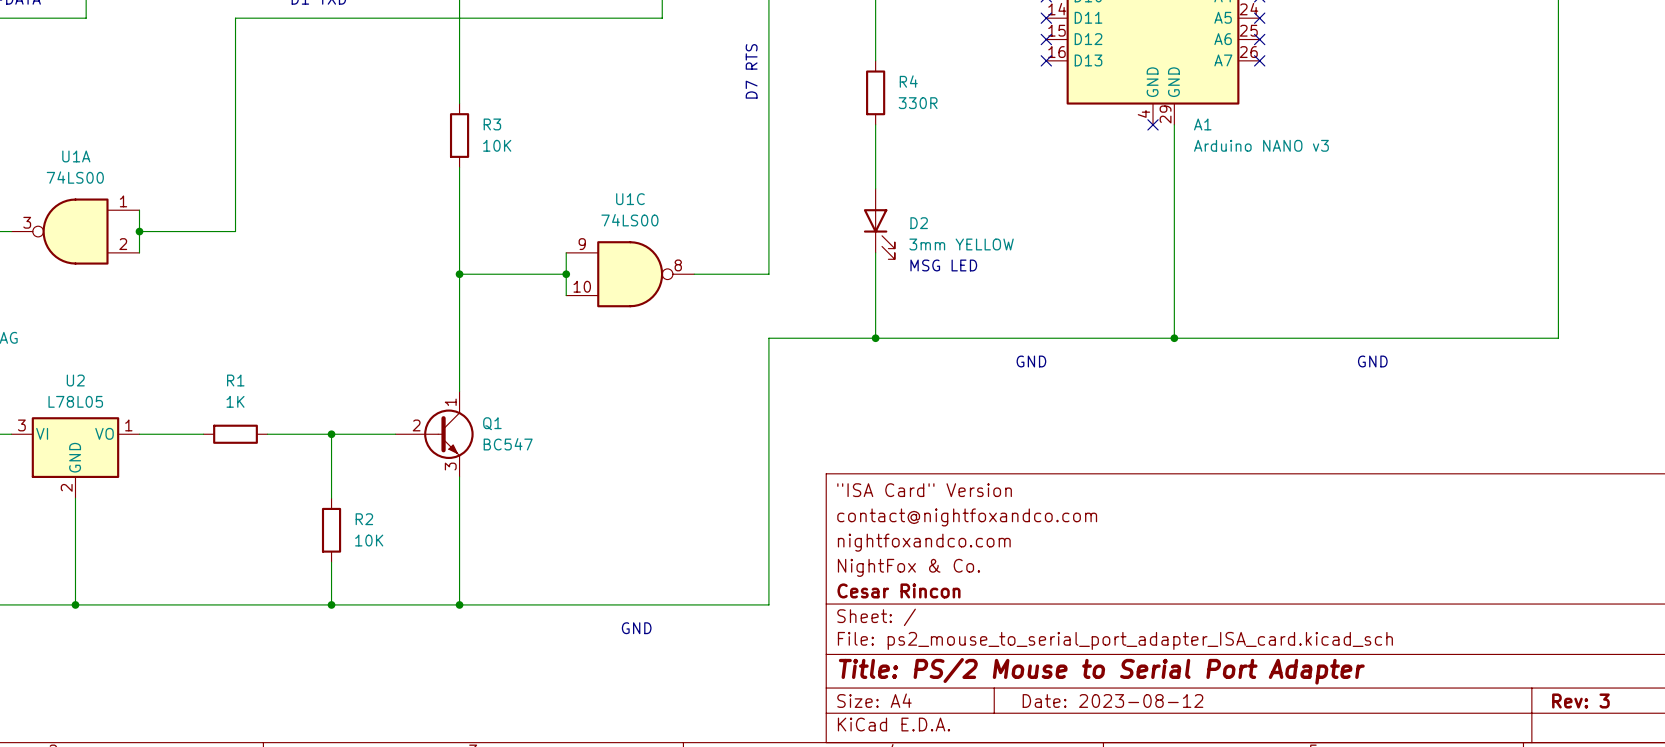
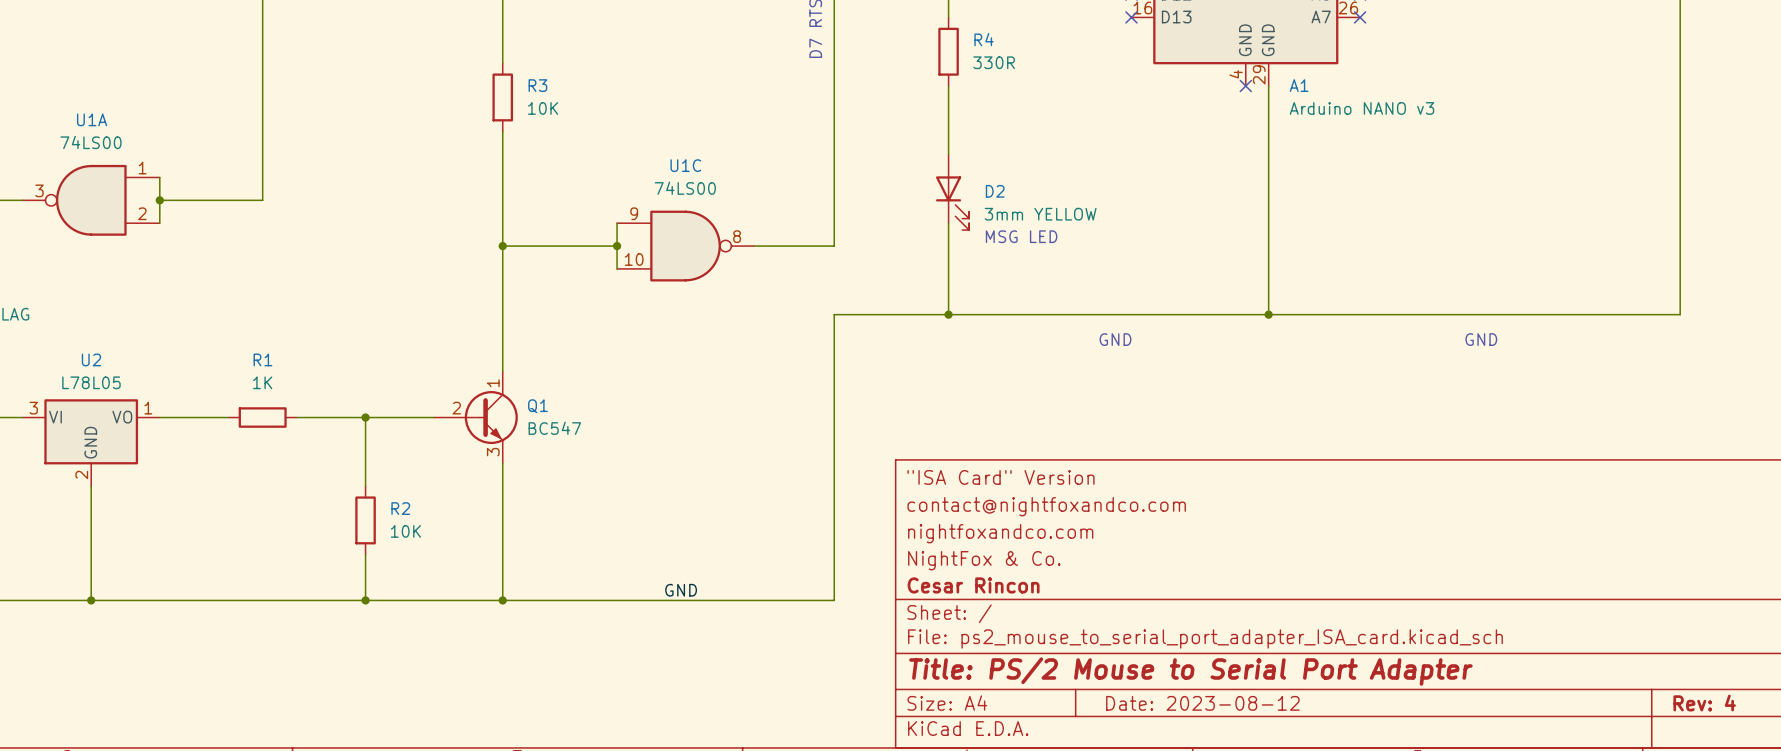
label: none -> GND (681, 590)
text: GND (636, 628) -> none
title block: Rev: 3 (1580, 701) -> Rev: 4 (1704, 703)

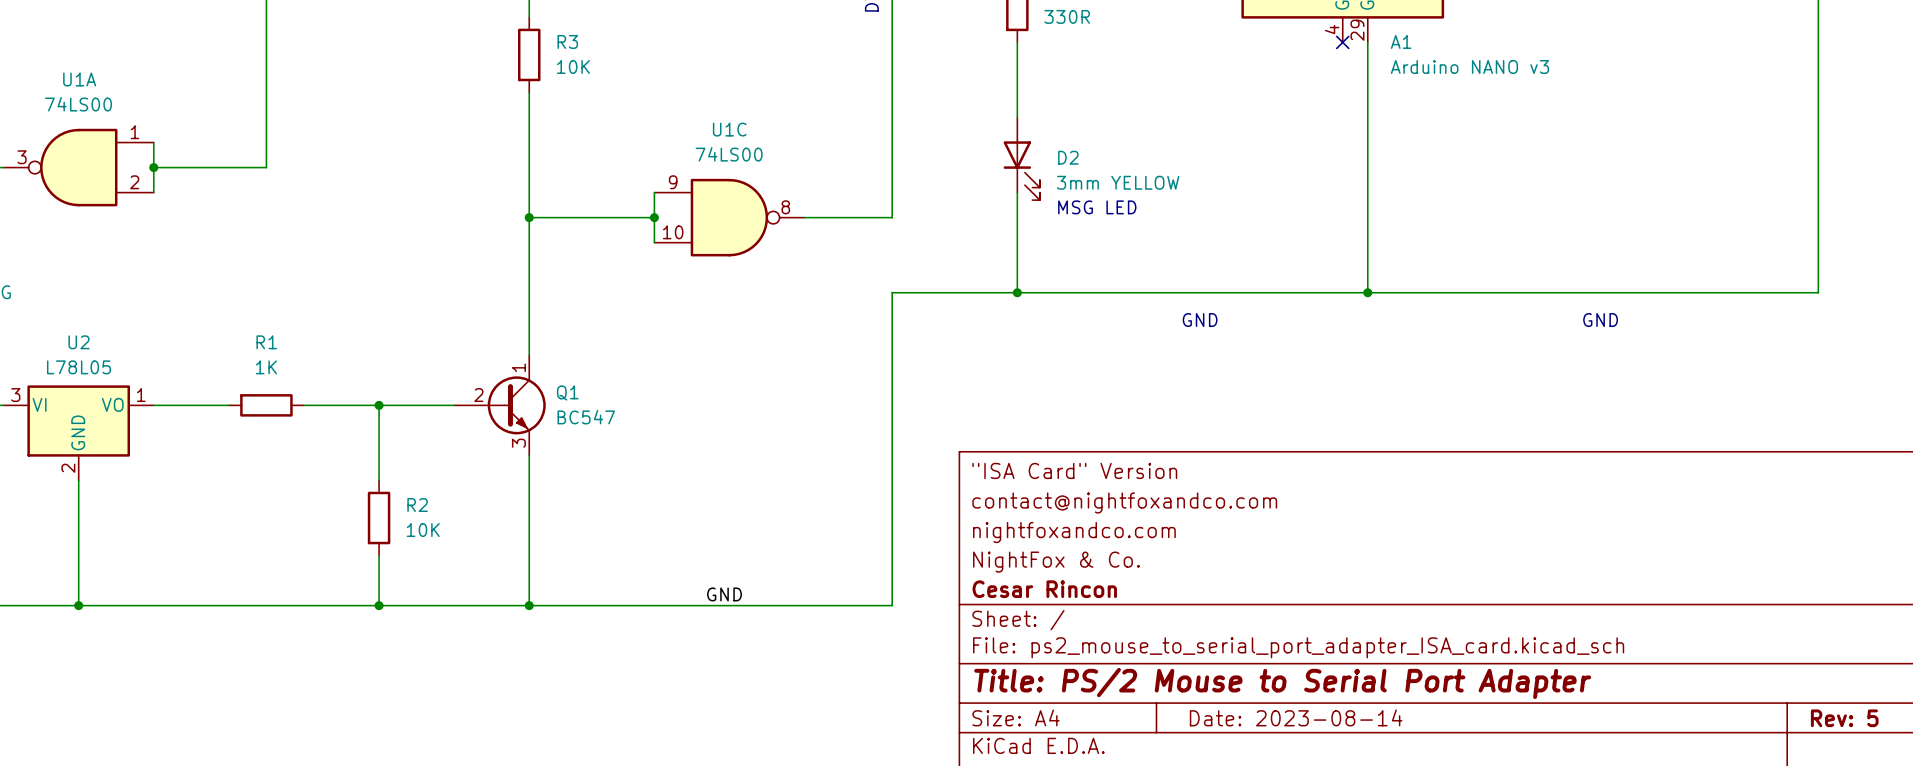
title block: Date: 2023-08-12 (1202, 703) -> Date: 2023-08-14 (1296, 717)
title block: Rev: 4 (1704, 703) -> Rev: 5 (1844, 718)

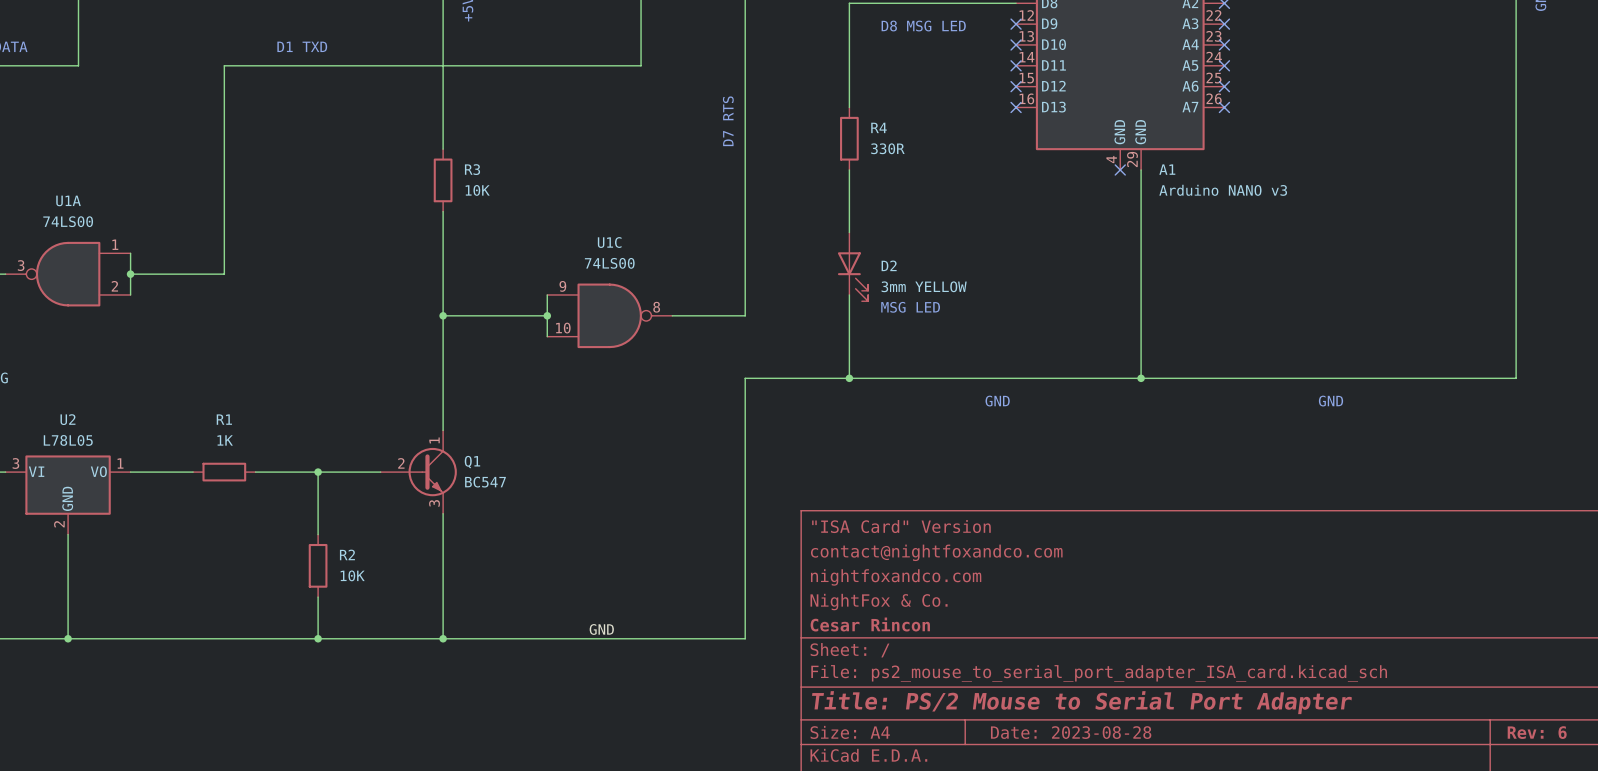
title block: Date: 2023-08-14 (1296, 717) -> Date: 2023-08-28 (1071, 732)
title block: Rev: 5 (1844, 718) -> Rev: 6 (1537, 732)

